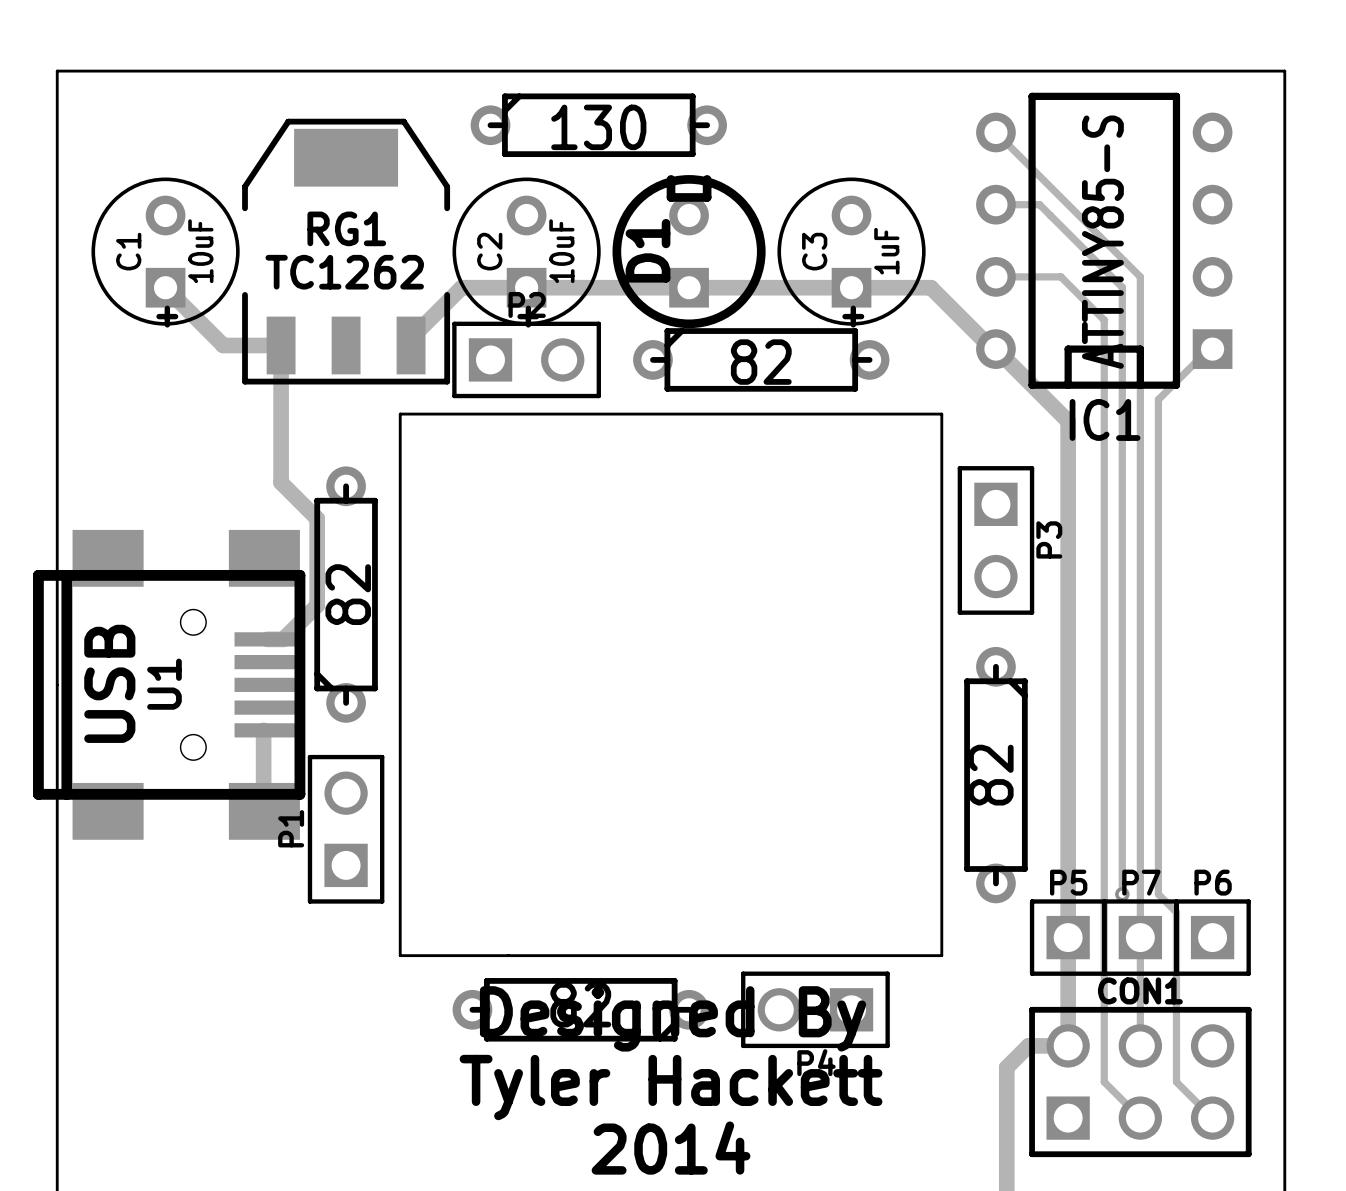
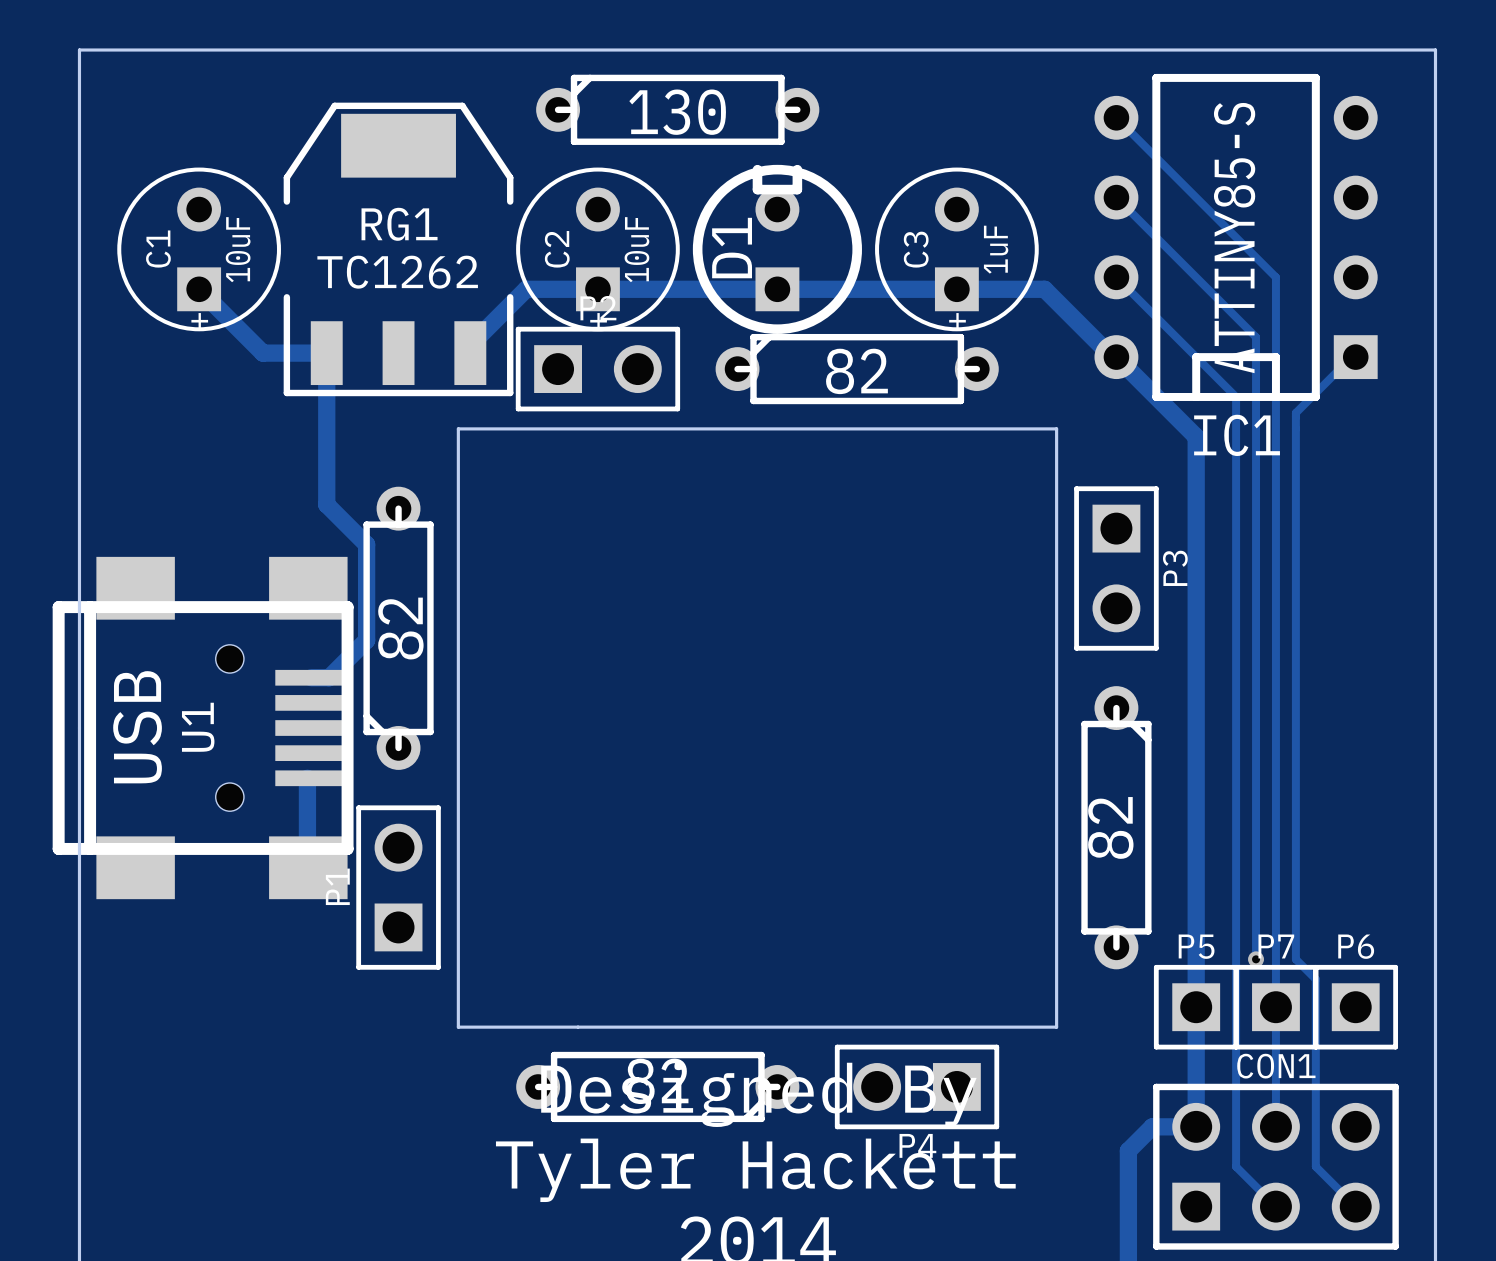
track: (995, 204) (1039, 204) (1122, 287) (1122, 331) -> (1116, 197) (1256, 337)
track: (995, 276) (1060, 276) (1104, 320) (1104, 385) -> (1116, 277) (1236, 396)

